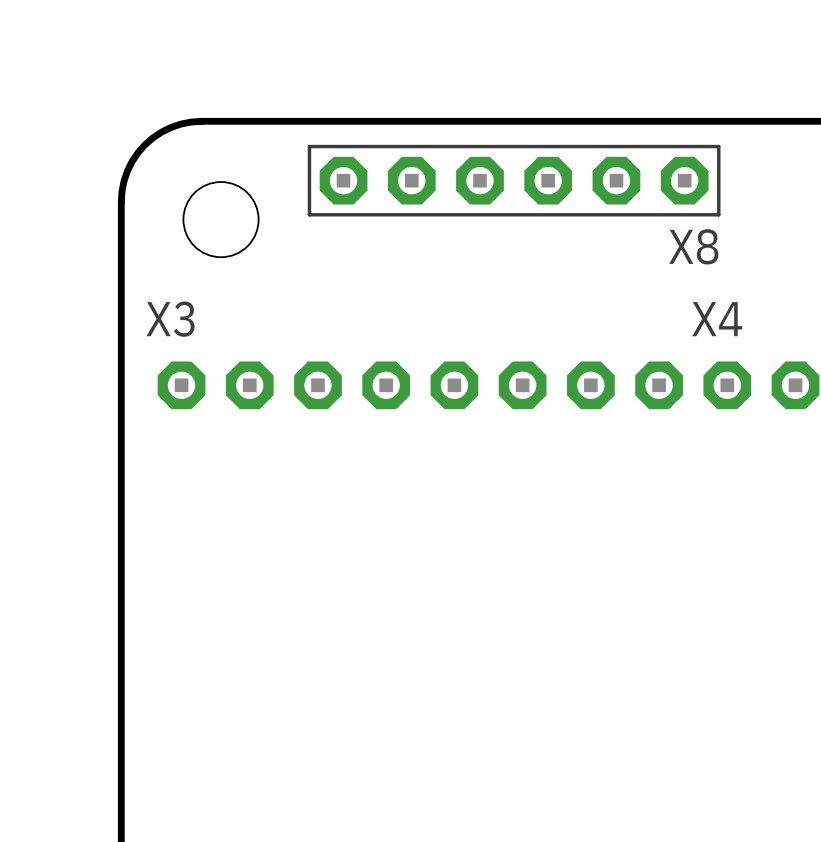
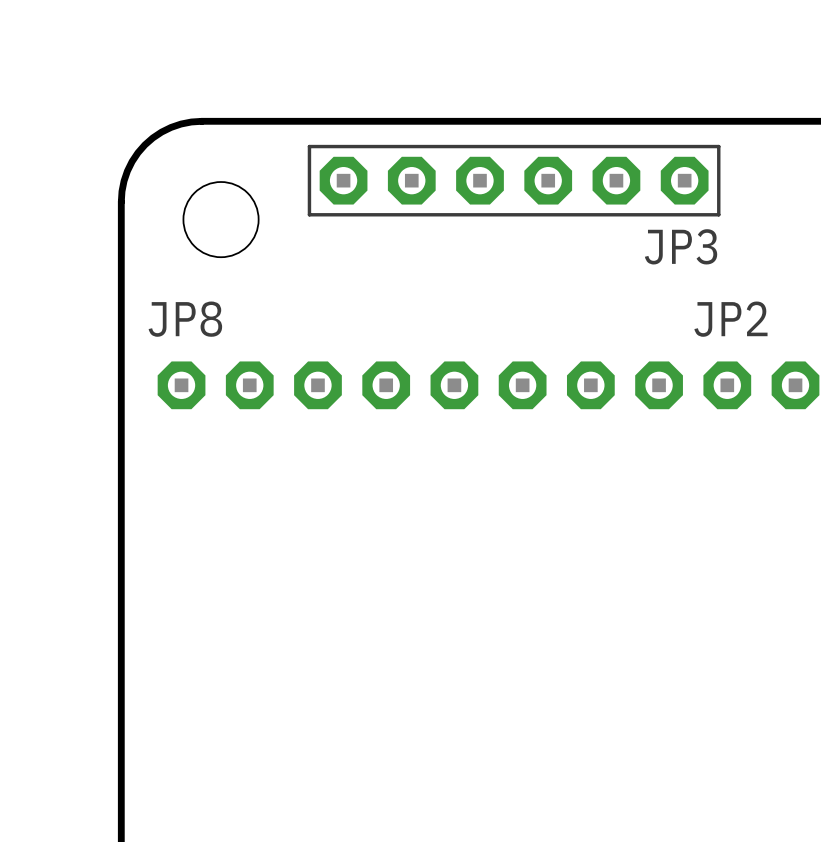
X8 name: X8 (693, 246) -> JP3 (681, 246)
X3 name: X3 (170, 319) -> JP8 (185, 319)
X4 name: X4 (717, 319) -> JP2 (730, 319)

